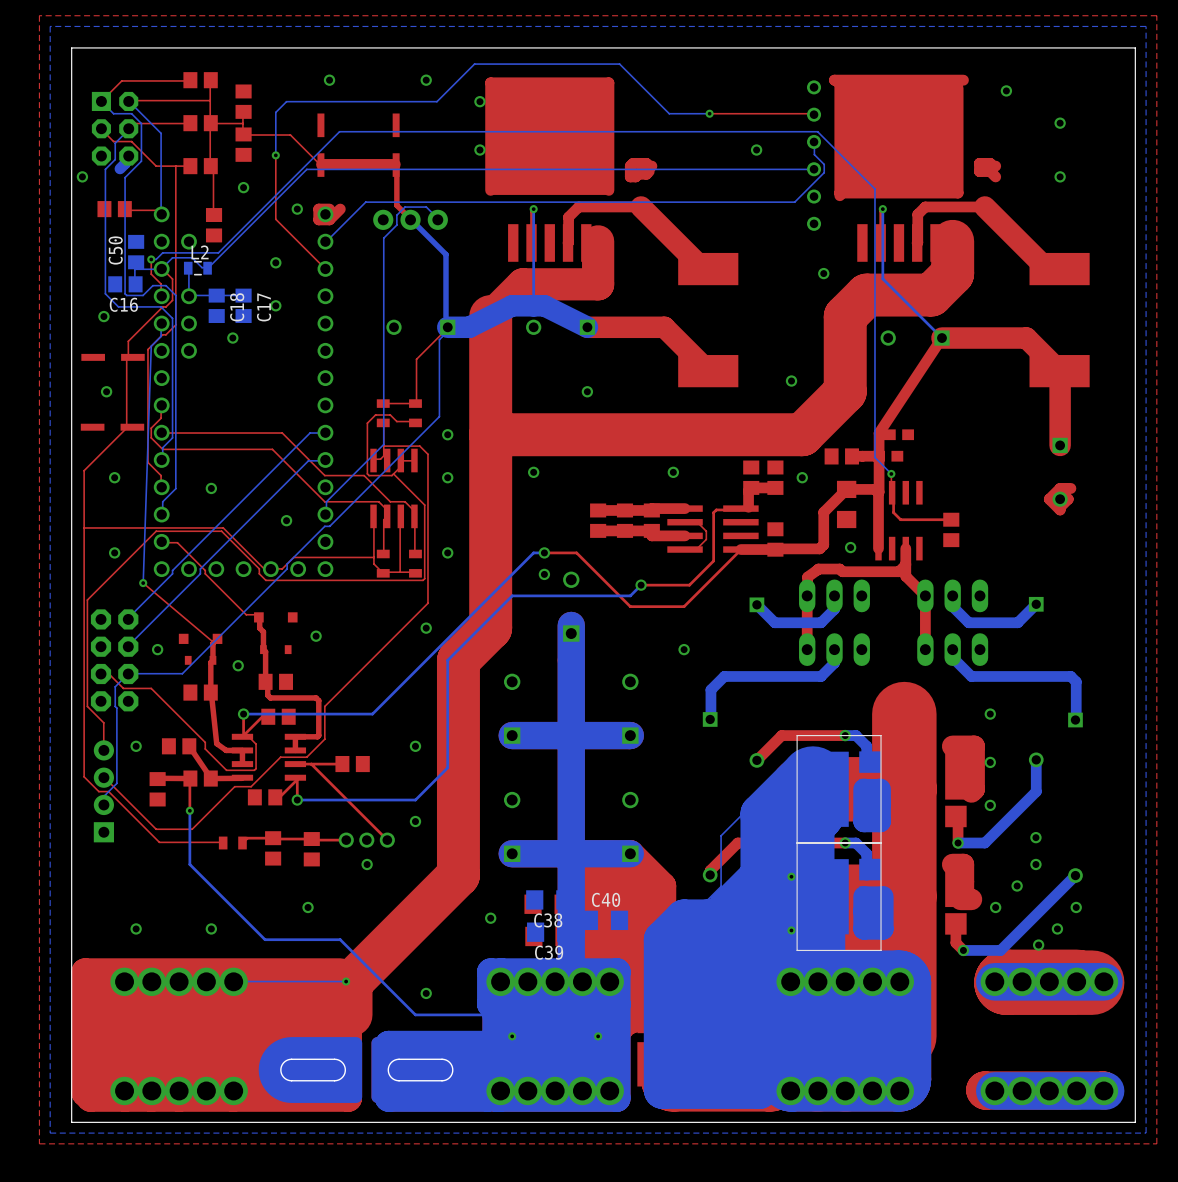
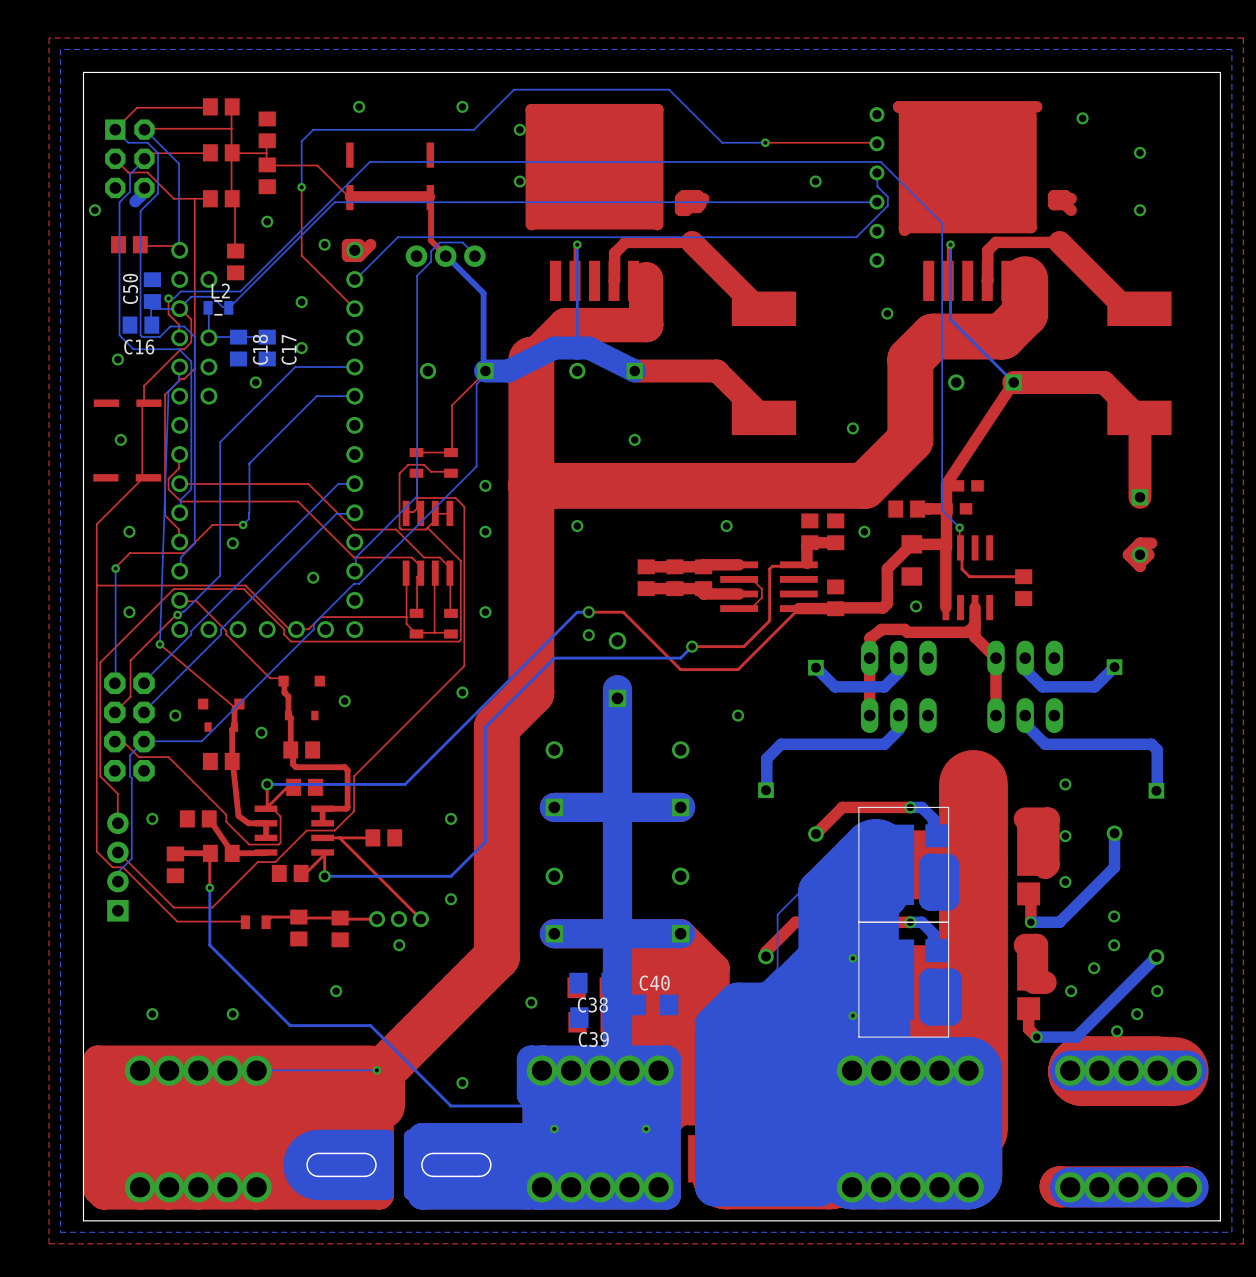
bottom track: none -> (354, 367) (295, 367) (220, 442) (220, 575) (184, 611) (177, 616) (177, 614)
bottom track: none -> (354, 396) (316, 396) (248, 464)
bottom track: none -> (249, 463) (248, 519) (243, 524)
top track: none -> (243, 524) (212, 524) (184, 553) (129, 553) (115, 568)
via: none -> (243, 524)
bottom track: none -> (115, 568) (114, 683)
via: none -> (115, 568)
top track: none -> (177, 614) (130, 660) (130, 696) (114, 712)
via: none -> (177, 614)

